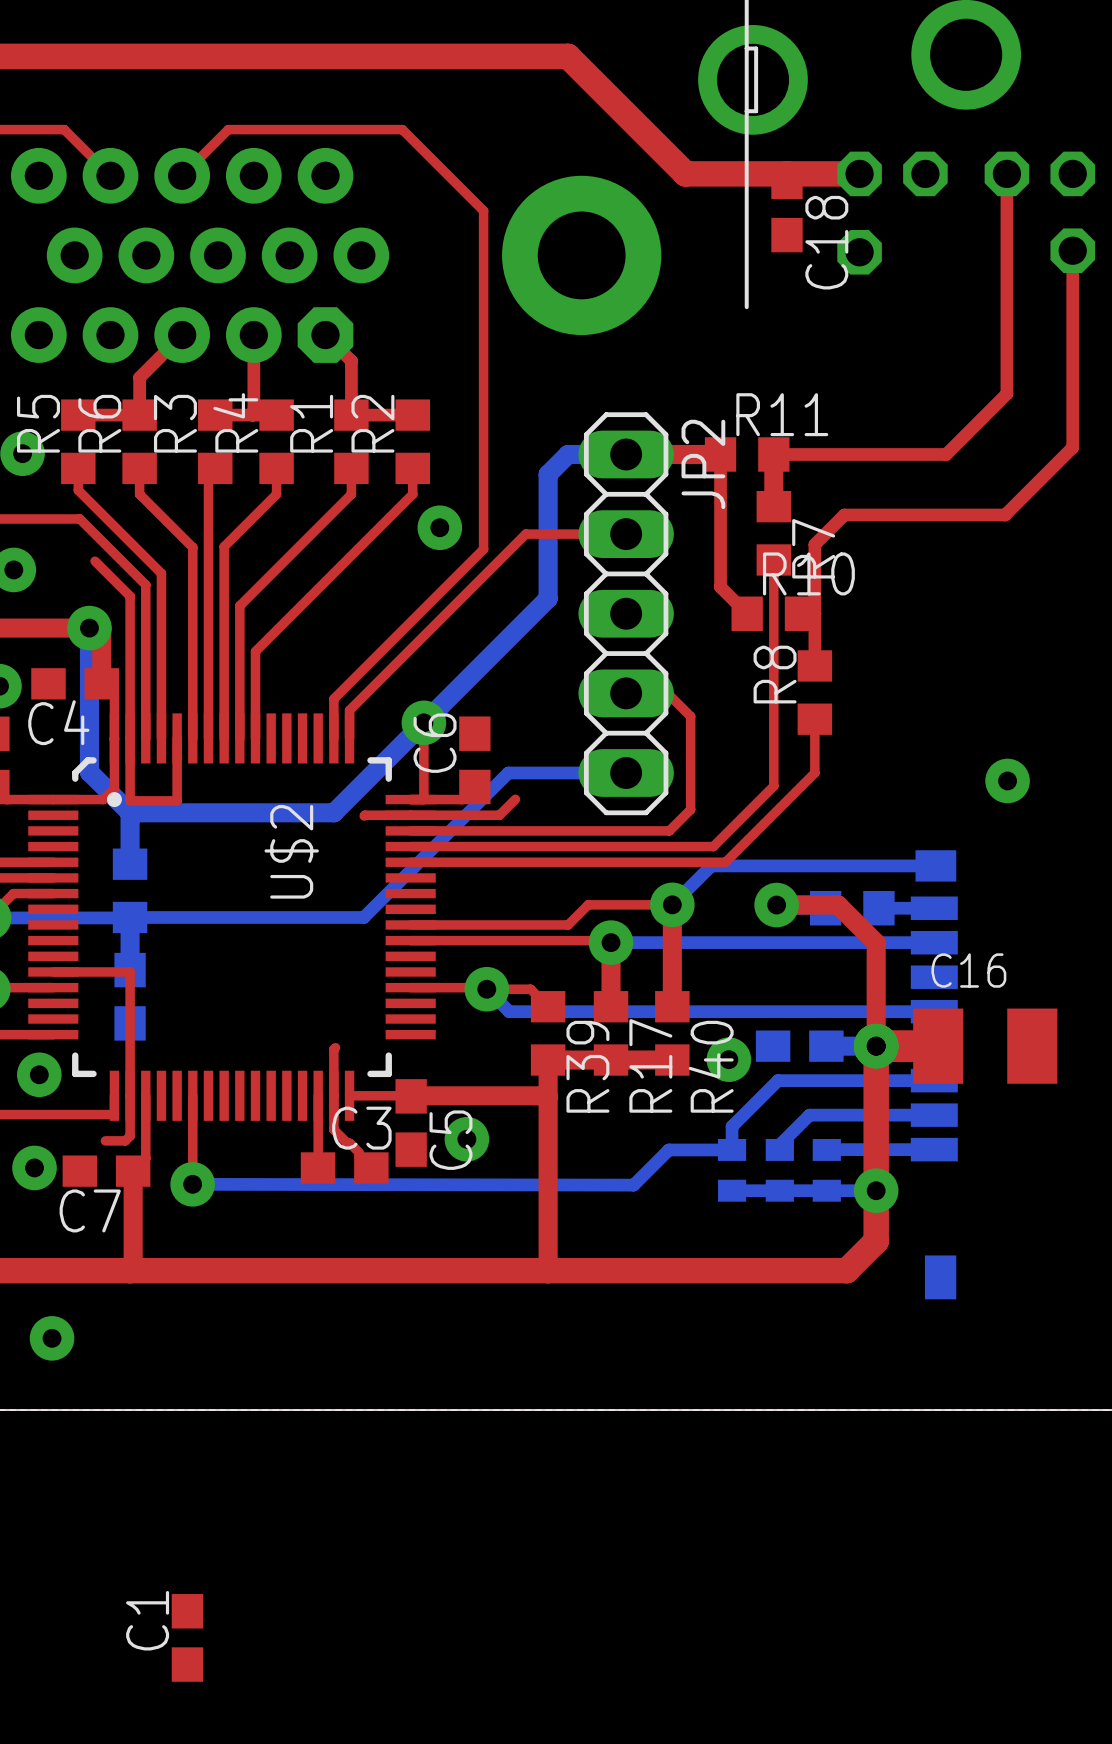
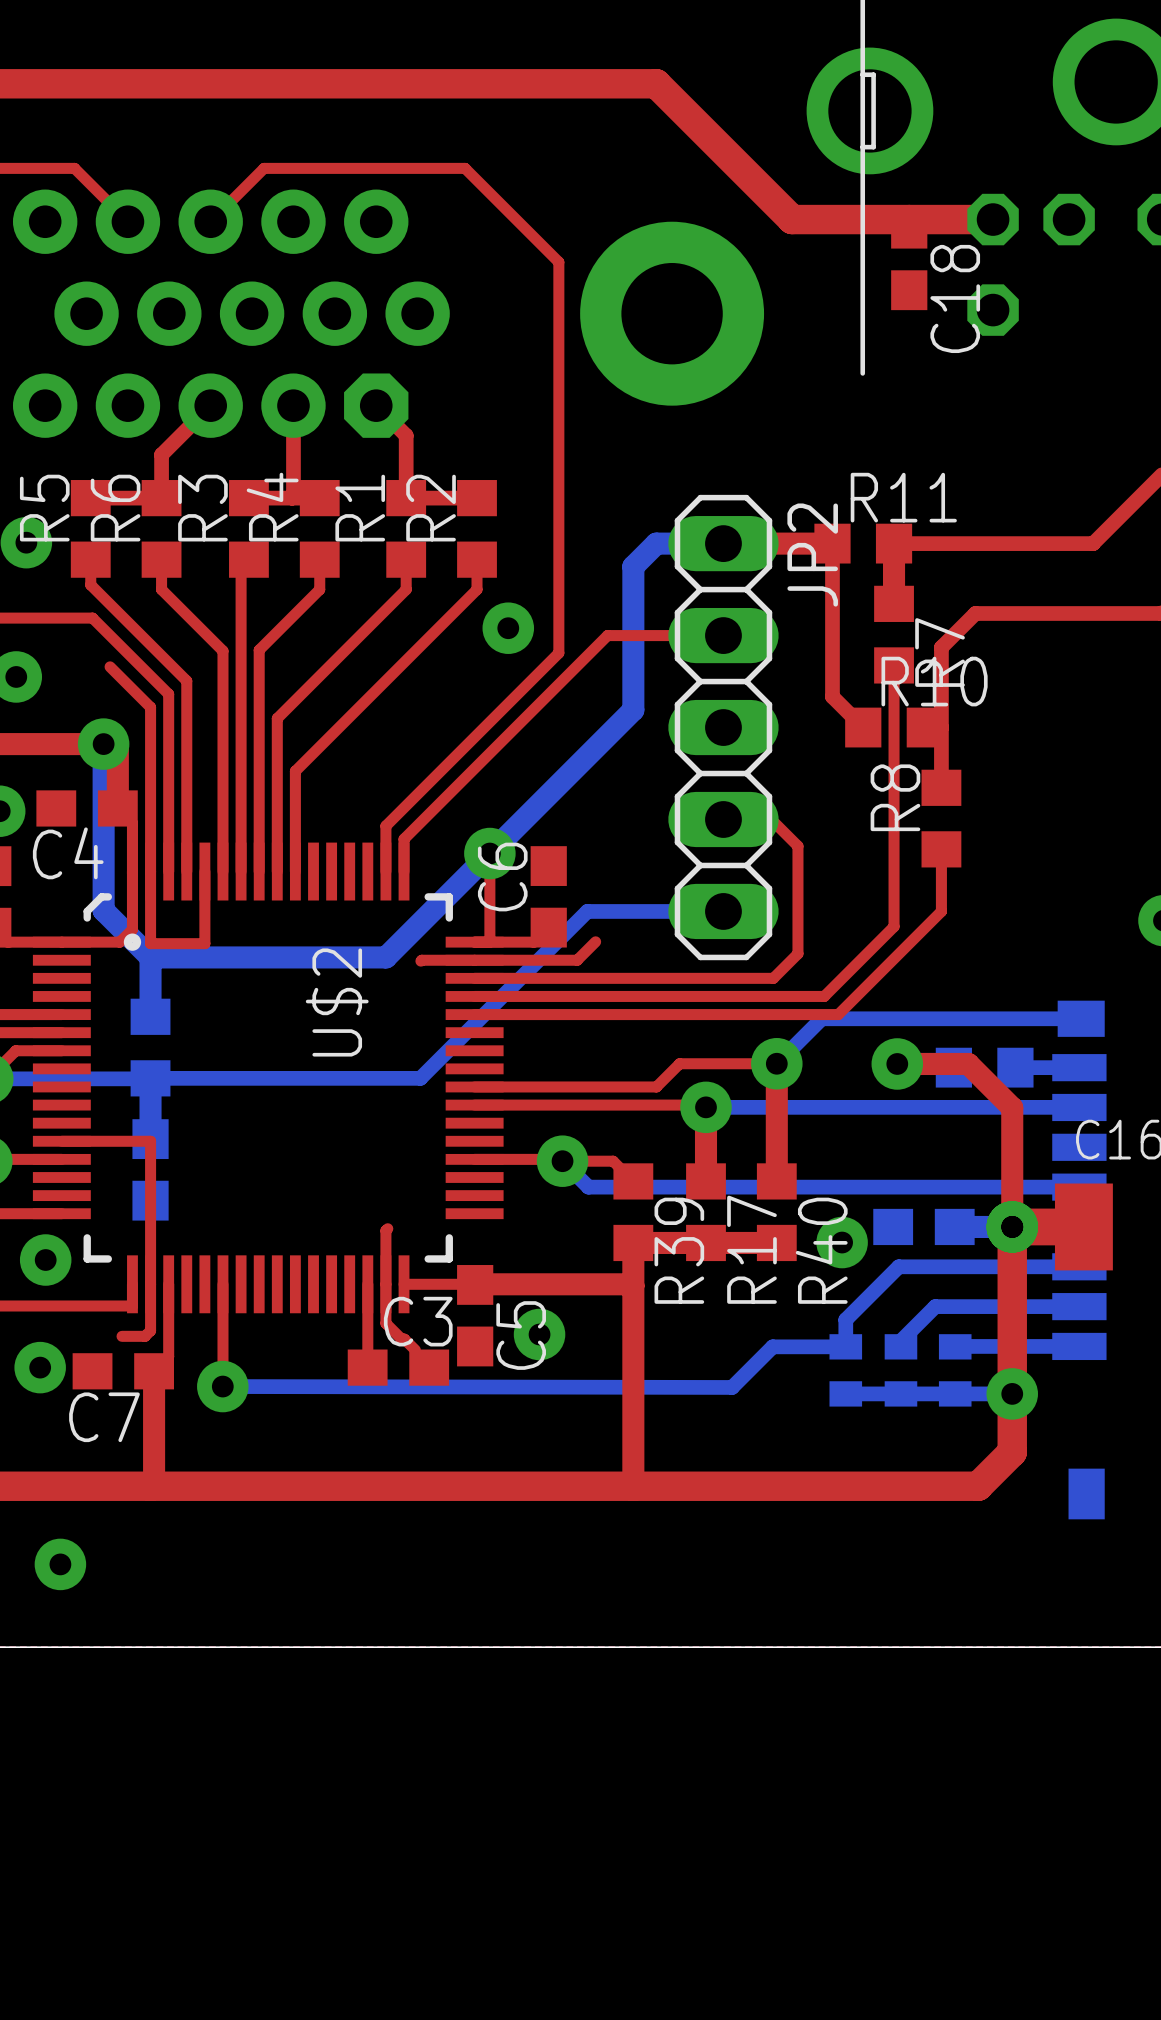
C1: (187, 1637) -> none

